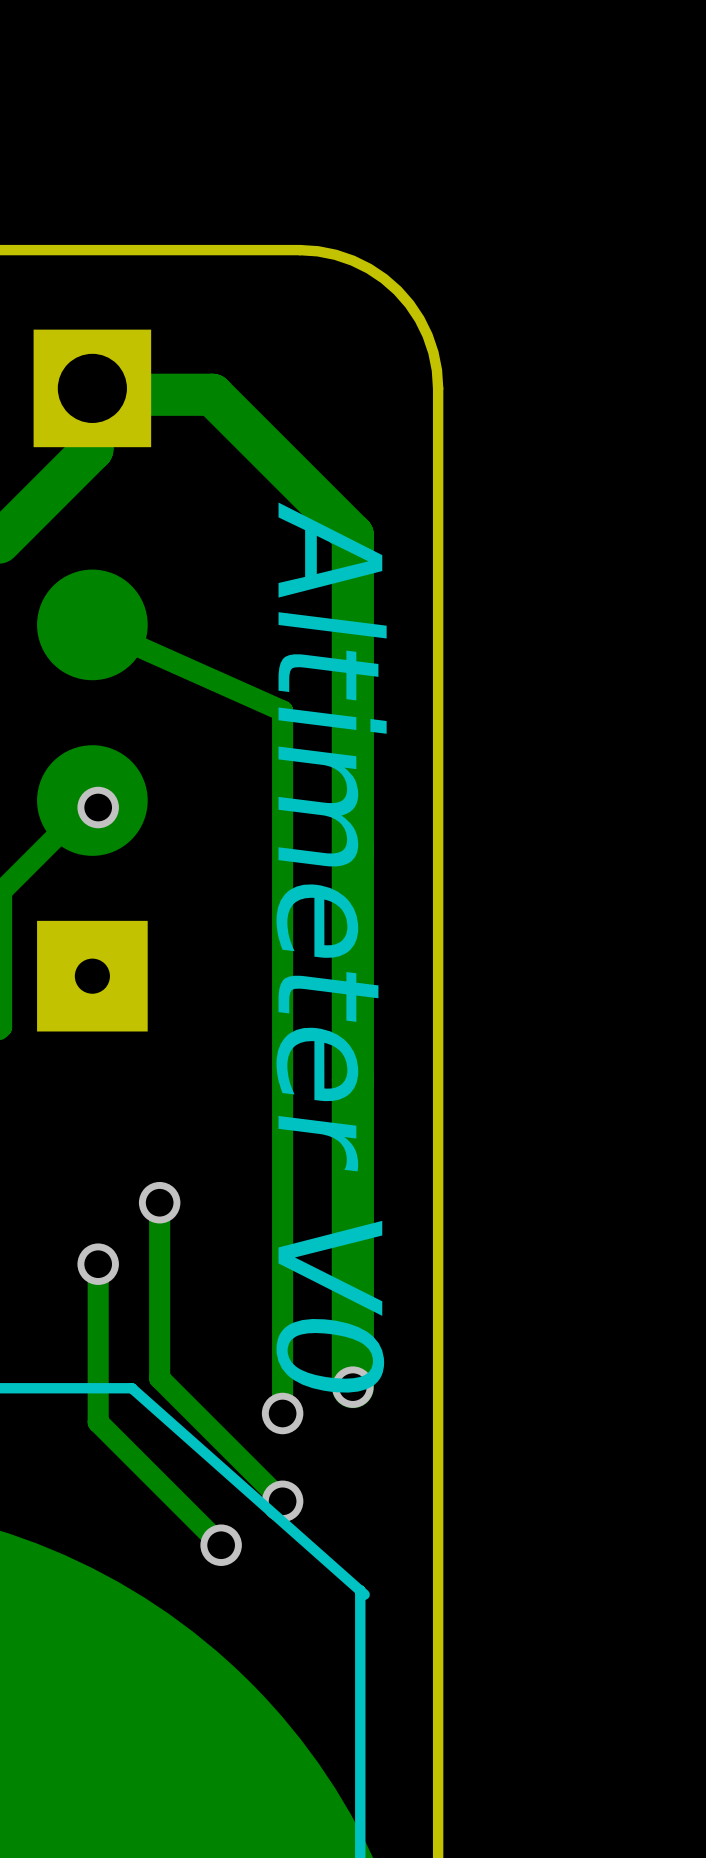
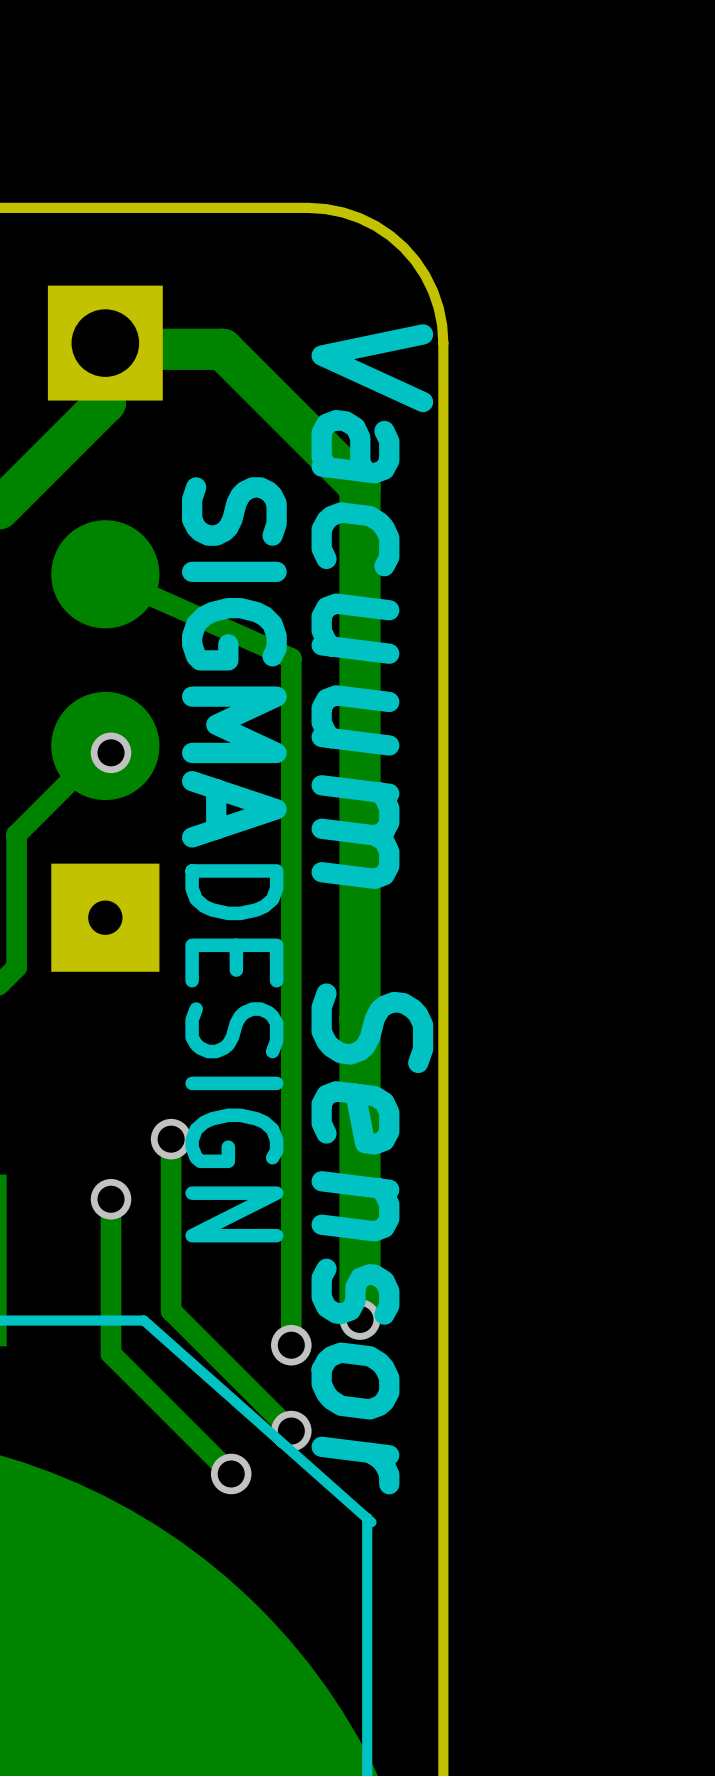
text: none -> SIGMA (234, 662)
text: Altimeter V0 (331, 948) -> Vacuum Sensor (372, 909)
text: none -> DESIGN (234, 1053)

